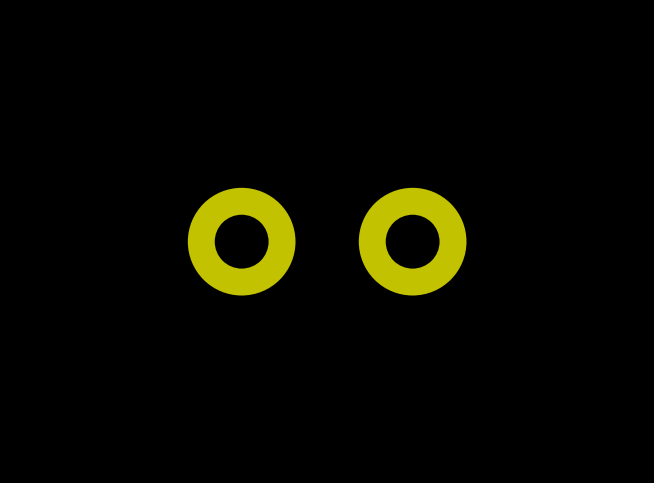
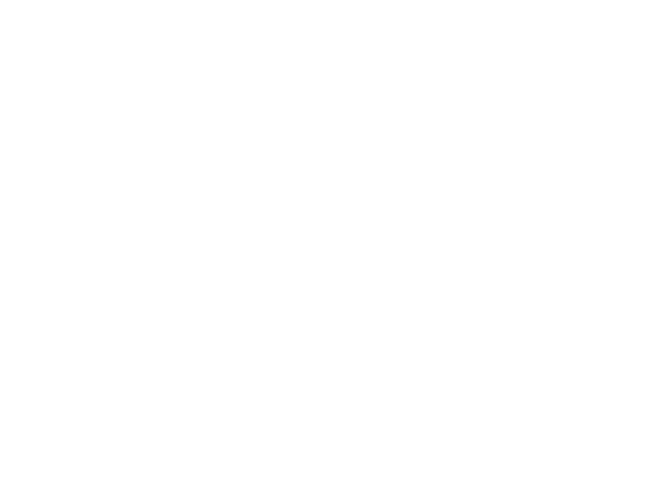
part: (327, 241) -> none

